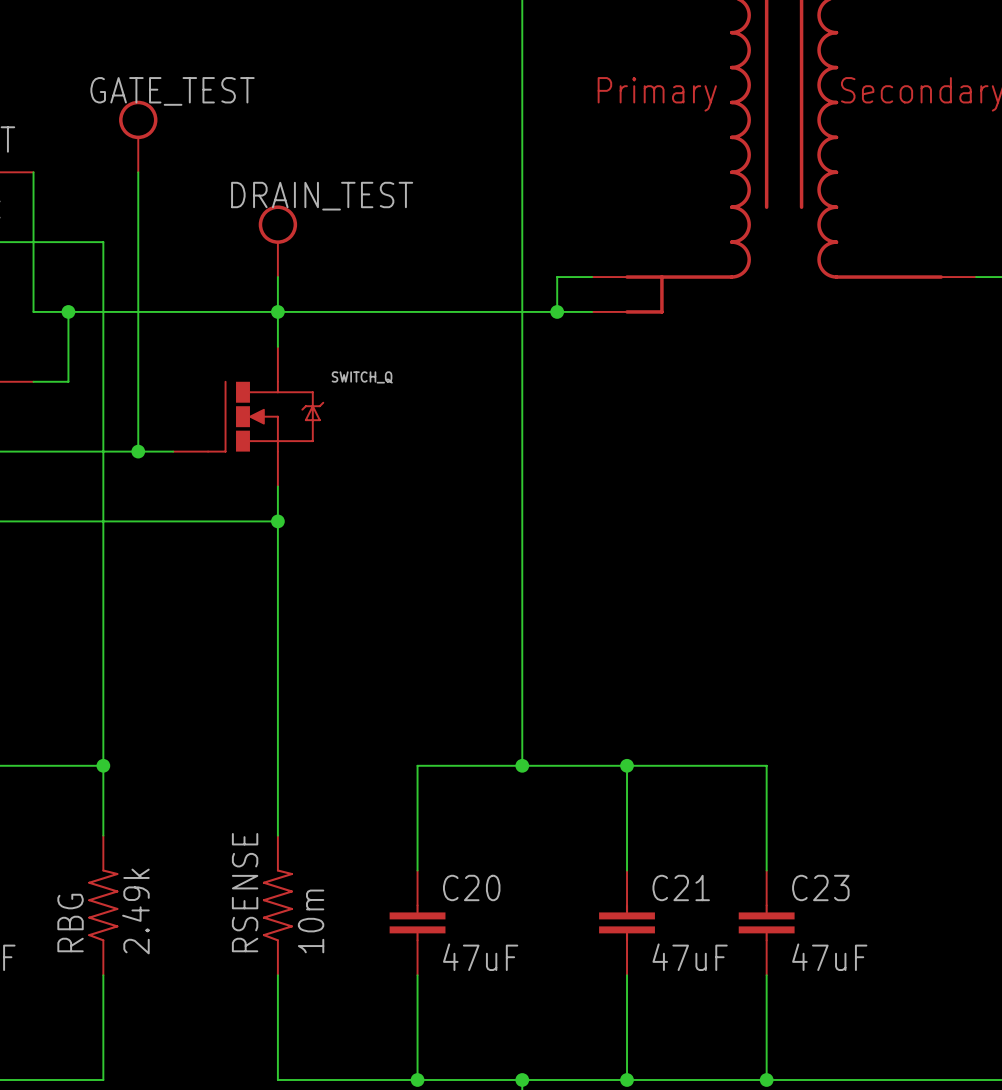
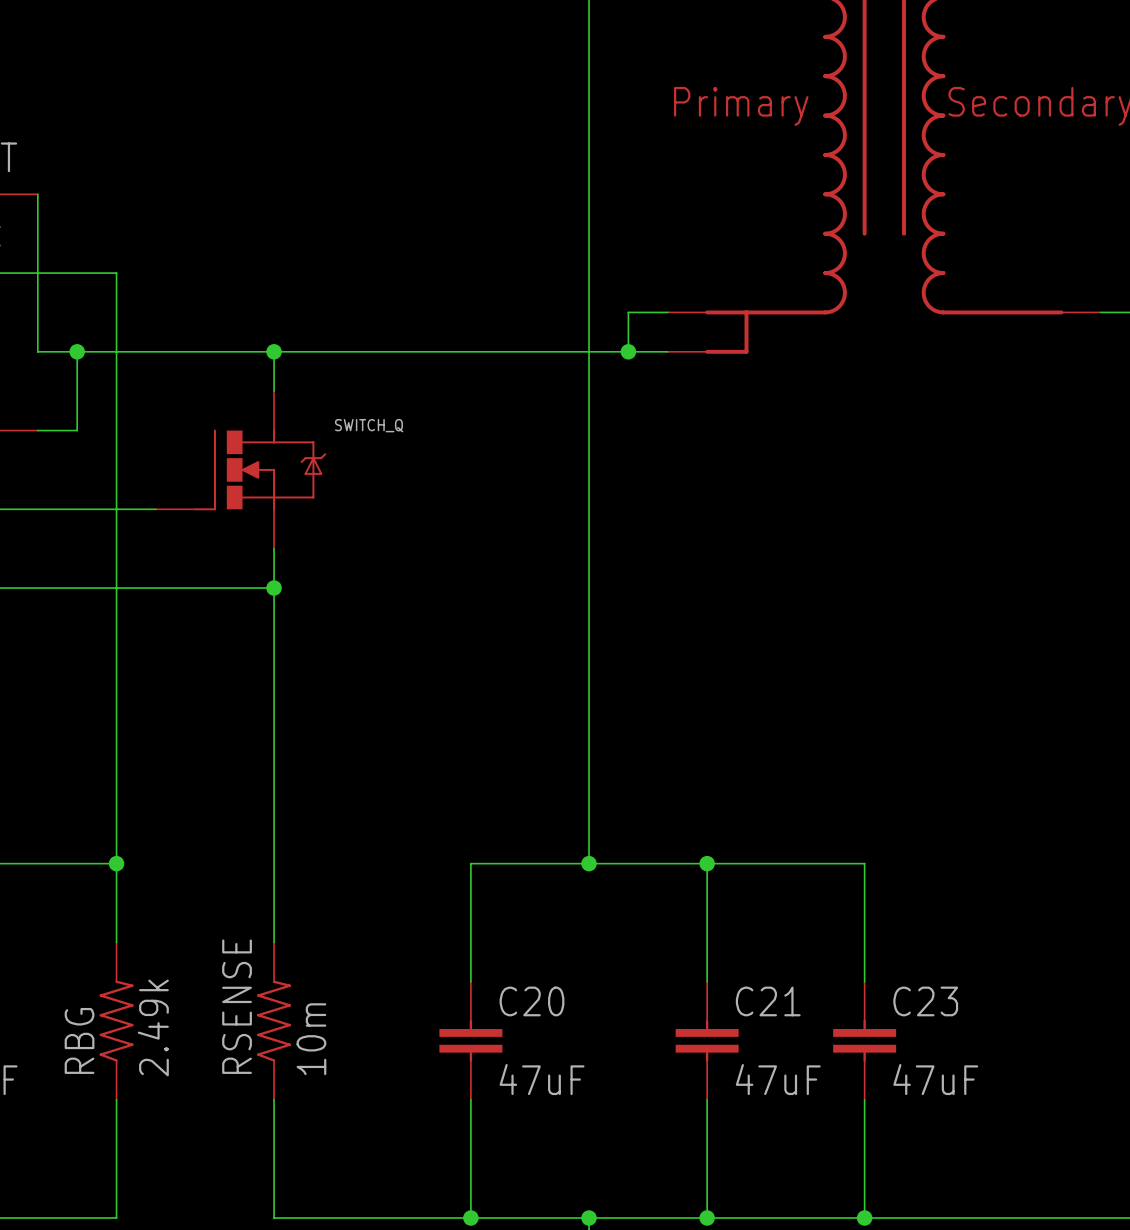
GATE_TEST: (138, 136) -> none
wire: (138, 172) (138, 451) (173, 451) -> none
DRAIN_TEST: (277, 241) -> none
wire: (277, 277) (277, 346) -> none
wire: none -> (274, 351) (274, 391)
junction position: (277, 311) -> (274, 351)
SWITCH_Q position: (248, 416) -> (241, 469)
junction: (138, 451) -> none
wire: (277, 486) (277, 835) -> (274, 548) (274, 942)
wire: (242, 521) (277, 521) -> none
junction position: (277, 521) -> (274, 588)
RSENSE position: (277, 905) -> (274, 1021)
wire: (277, 975) (277, 1080) -> (274, 1099) (274, 1218) (313, 1218)

